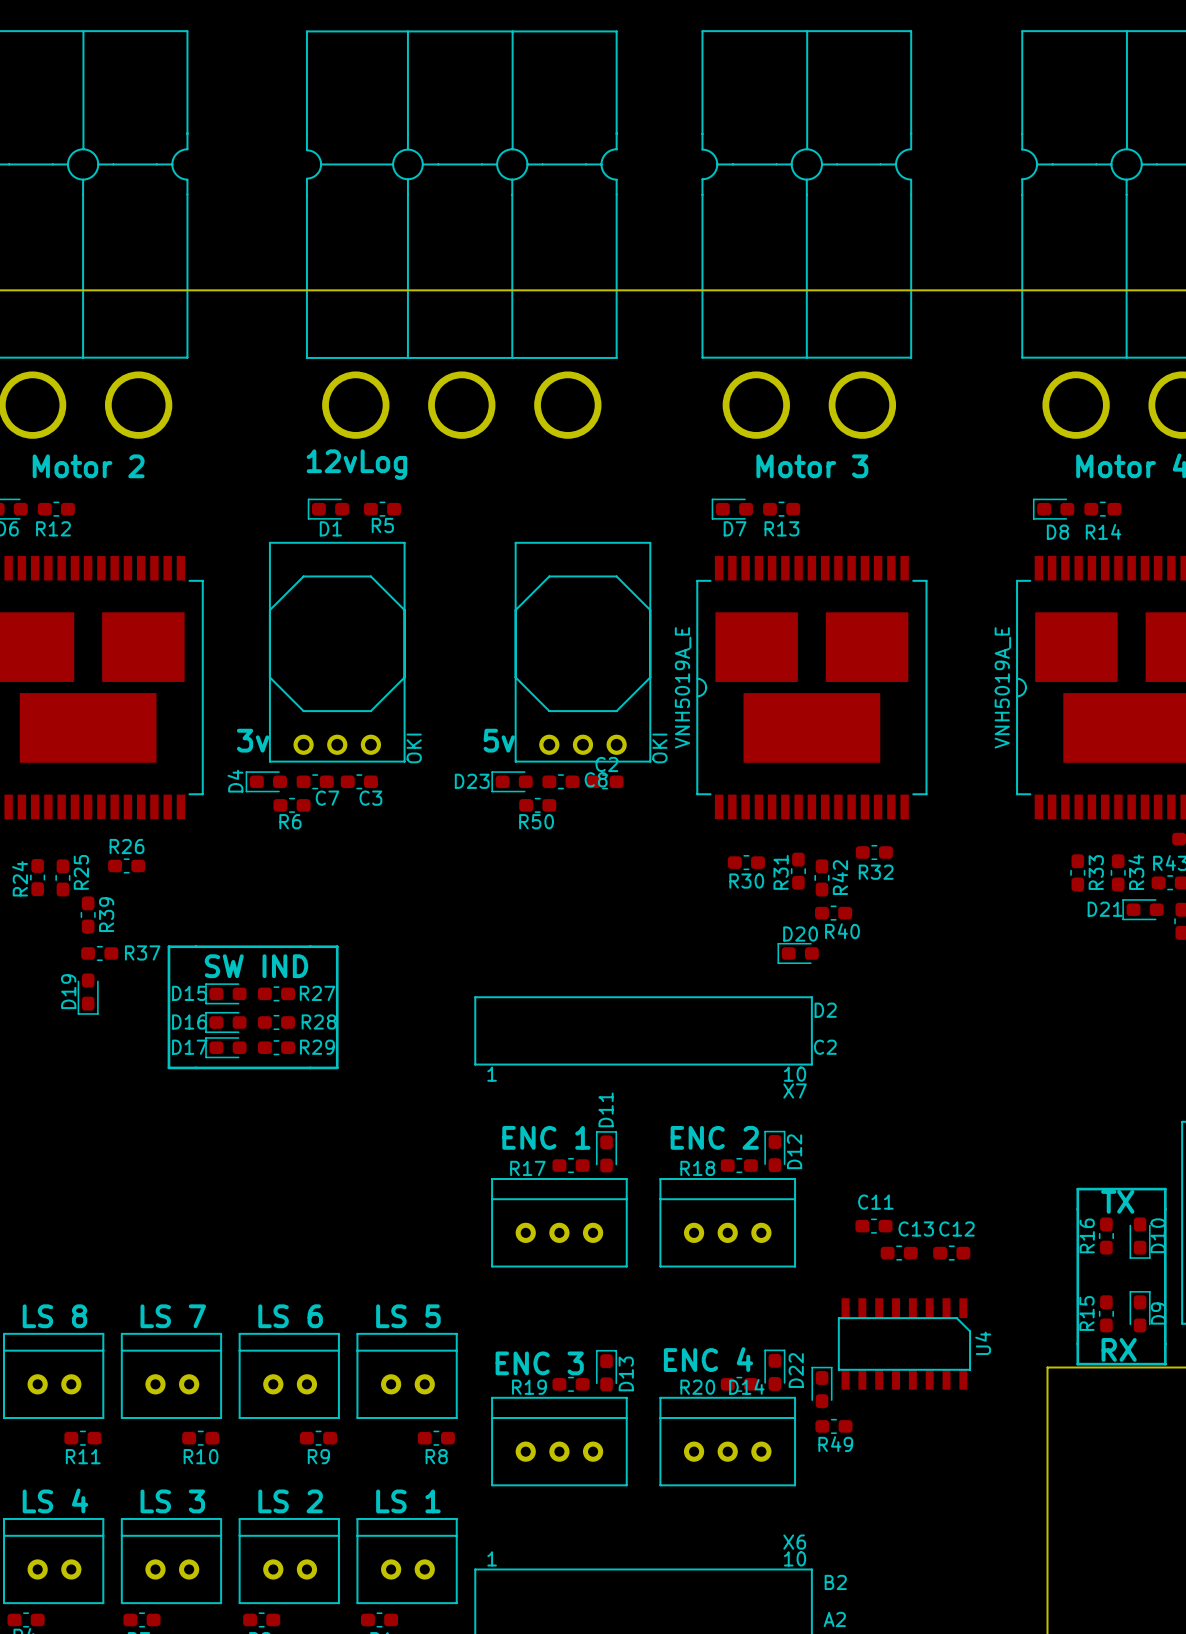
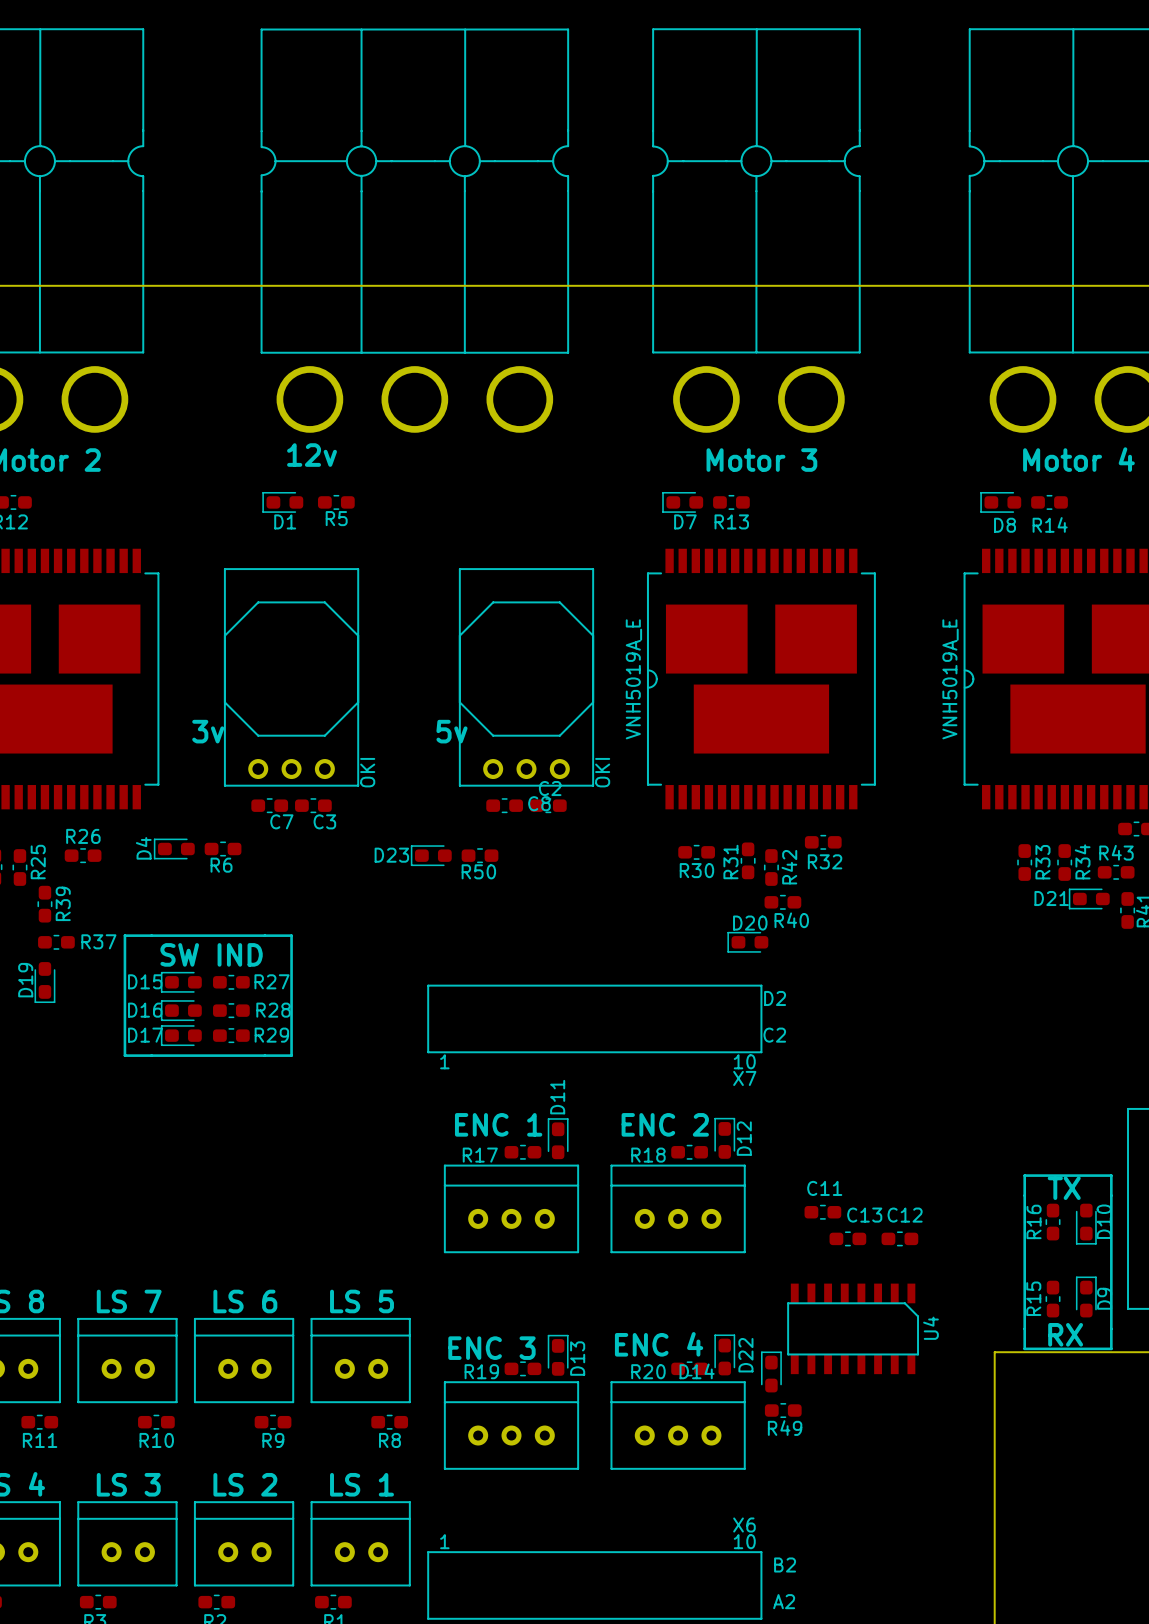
text: 12vLog (356, 464) -> 12v (312, 455)
part position: (337, 652) -> (291, 677)
part position: (582, 652) -> (526, 677)
D4 position: (266, 781) -> (174, 849)
C7 position: (315, 781) -> (269, 805)
C3 position: (359, 781) -> (313, 805)
D23 position: (512, 781) -> (431, 855)
C8 position: (560, 781) -> (504, 805)
C2 position: (605, 781) -> (548, 805)
R6 position: (291, 805) -> (223, 849)
R50 position: (537, 805) -> (480, 855)

